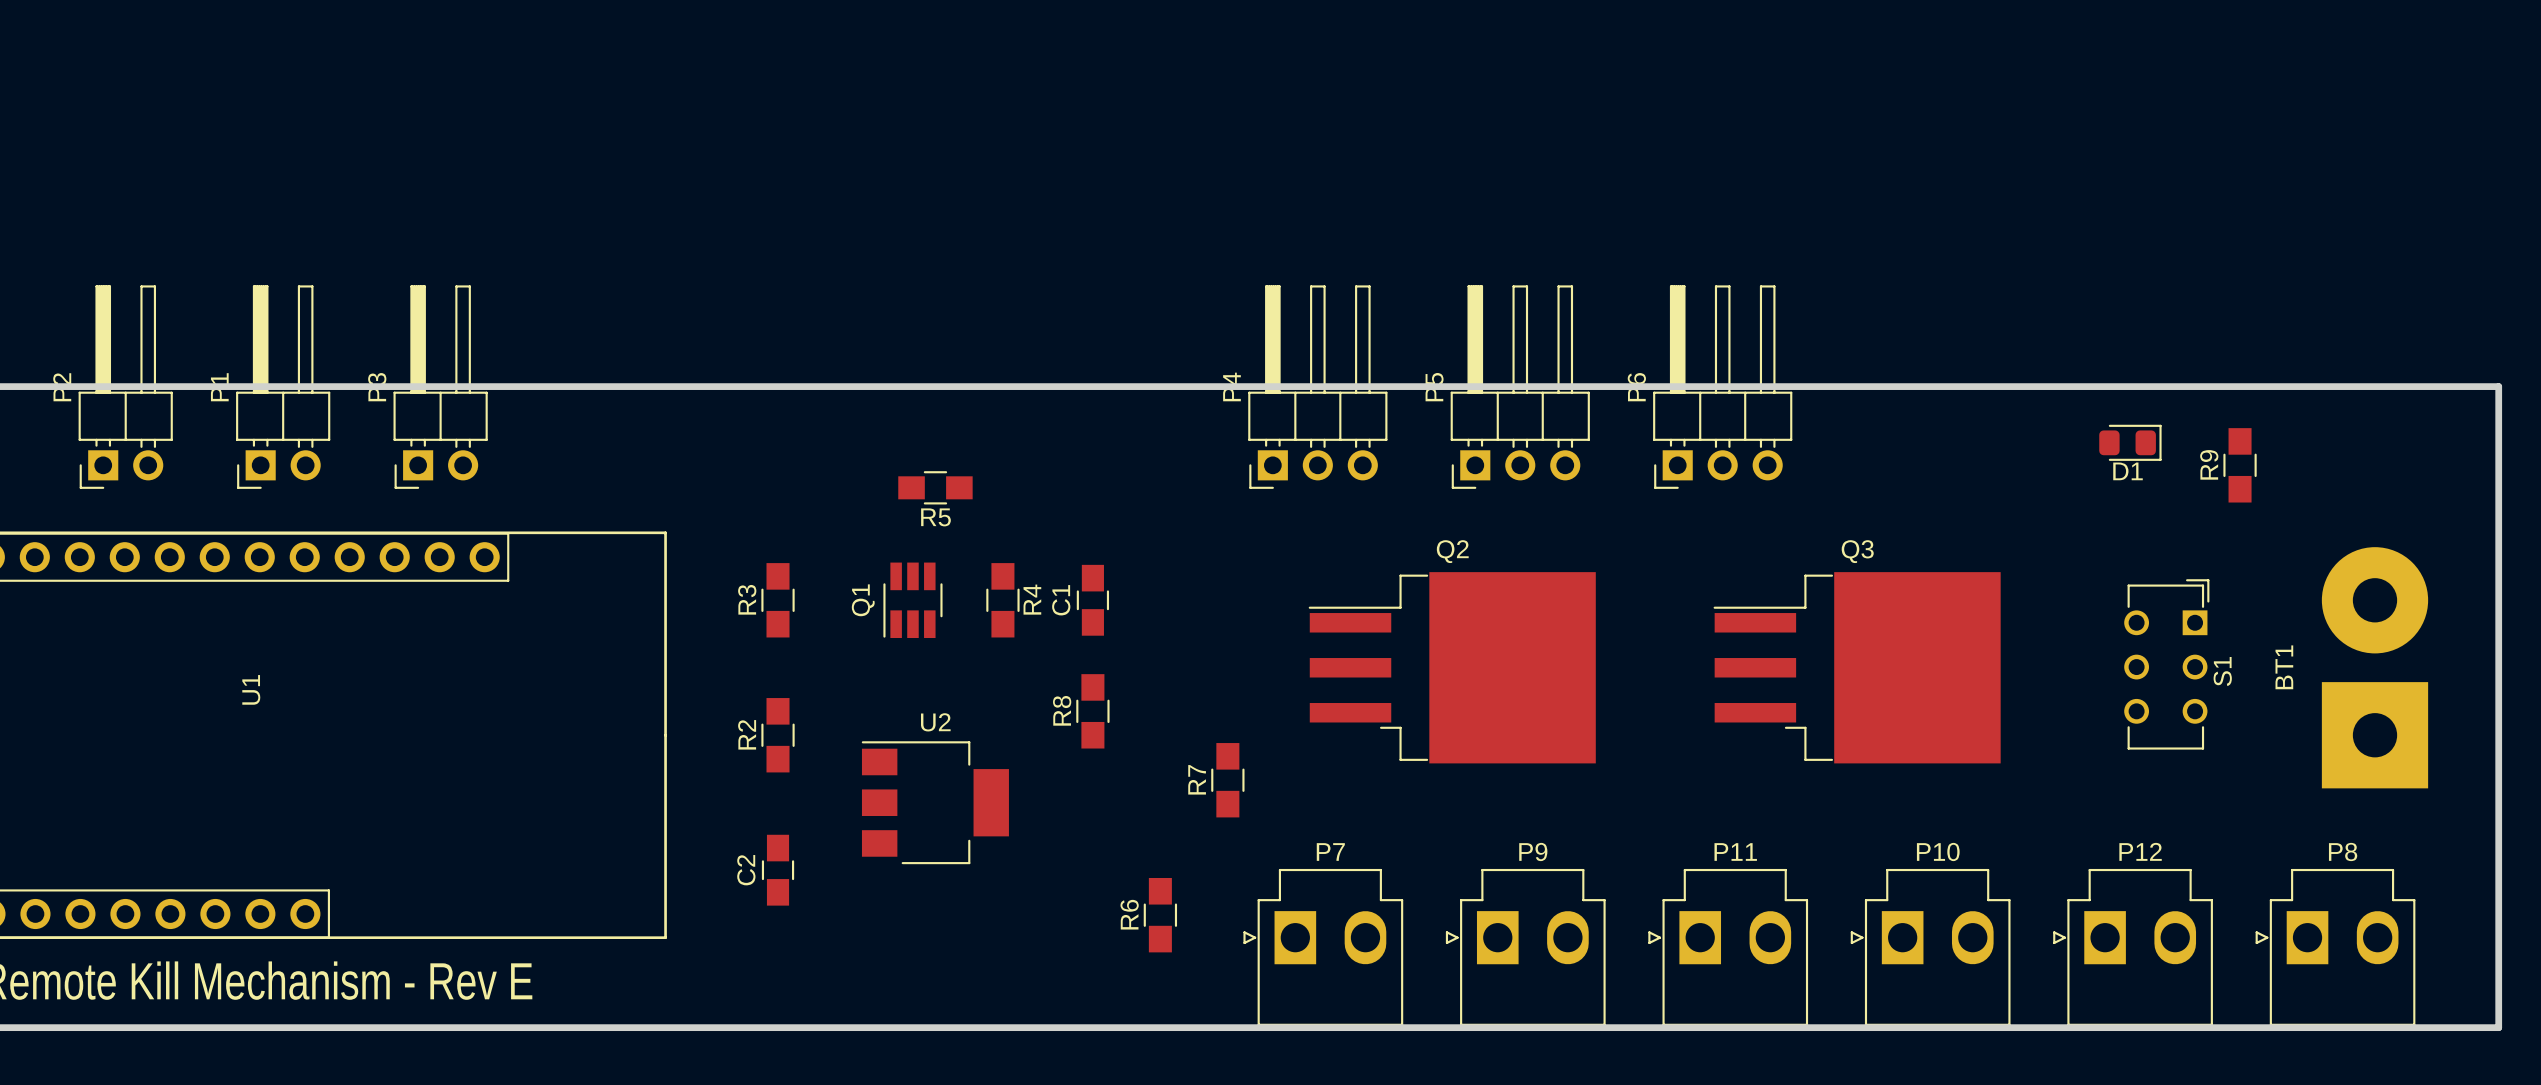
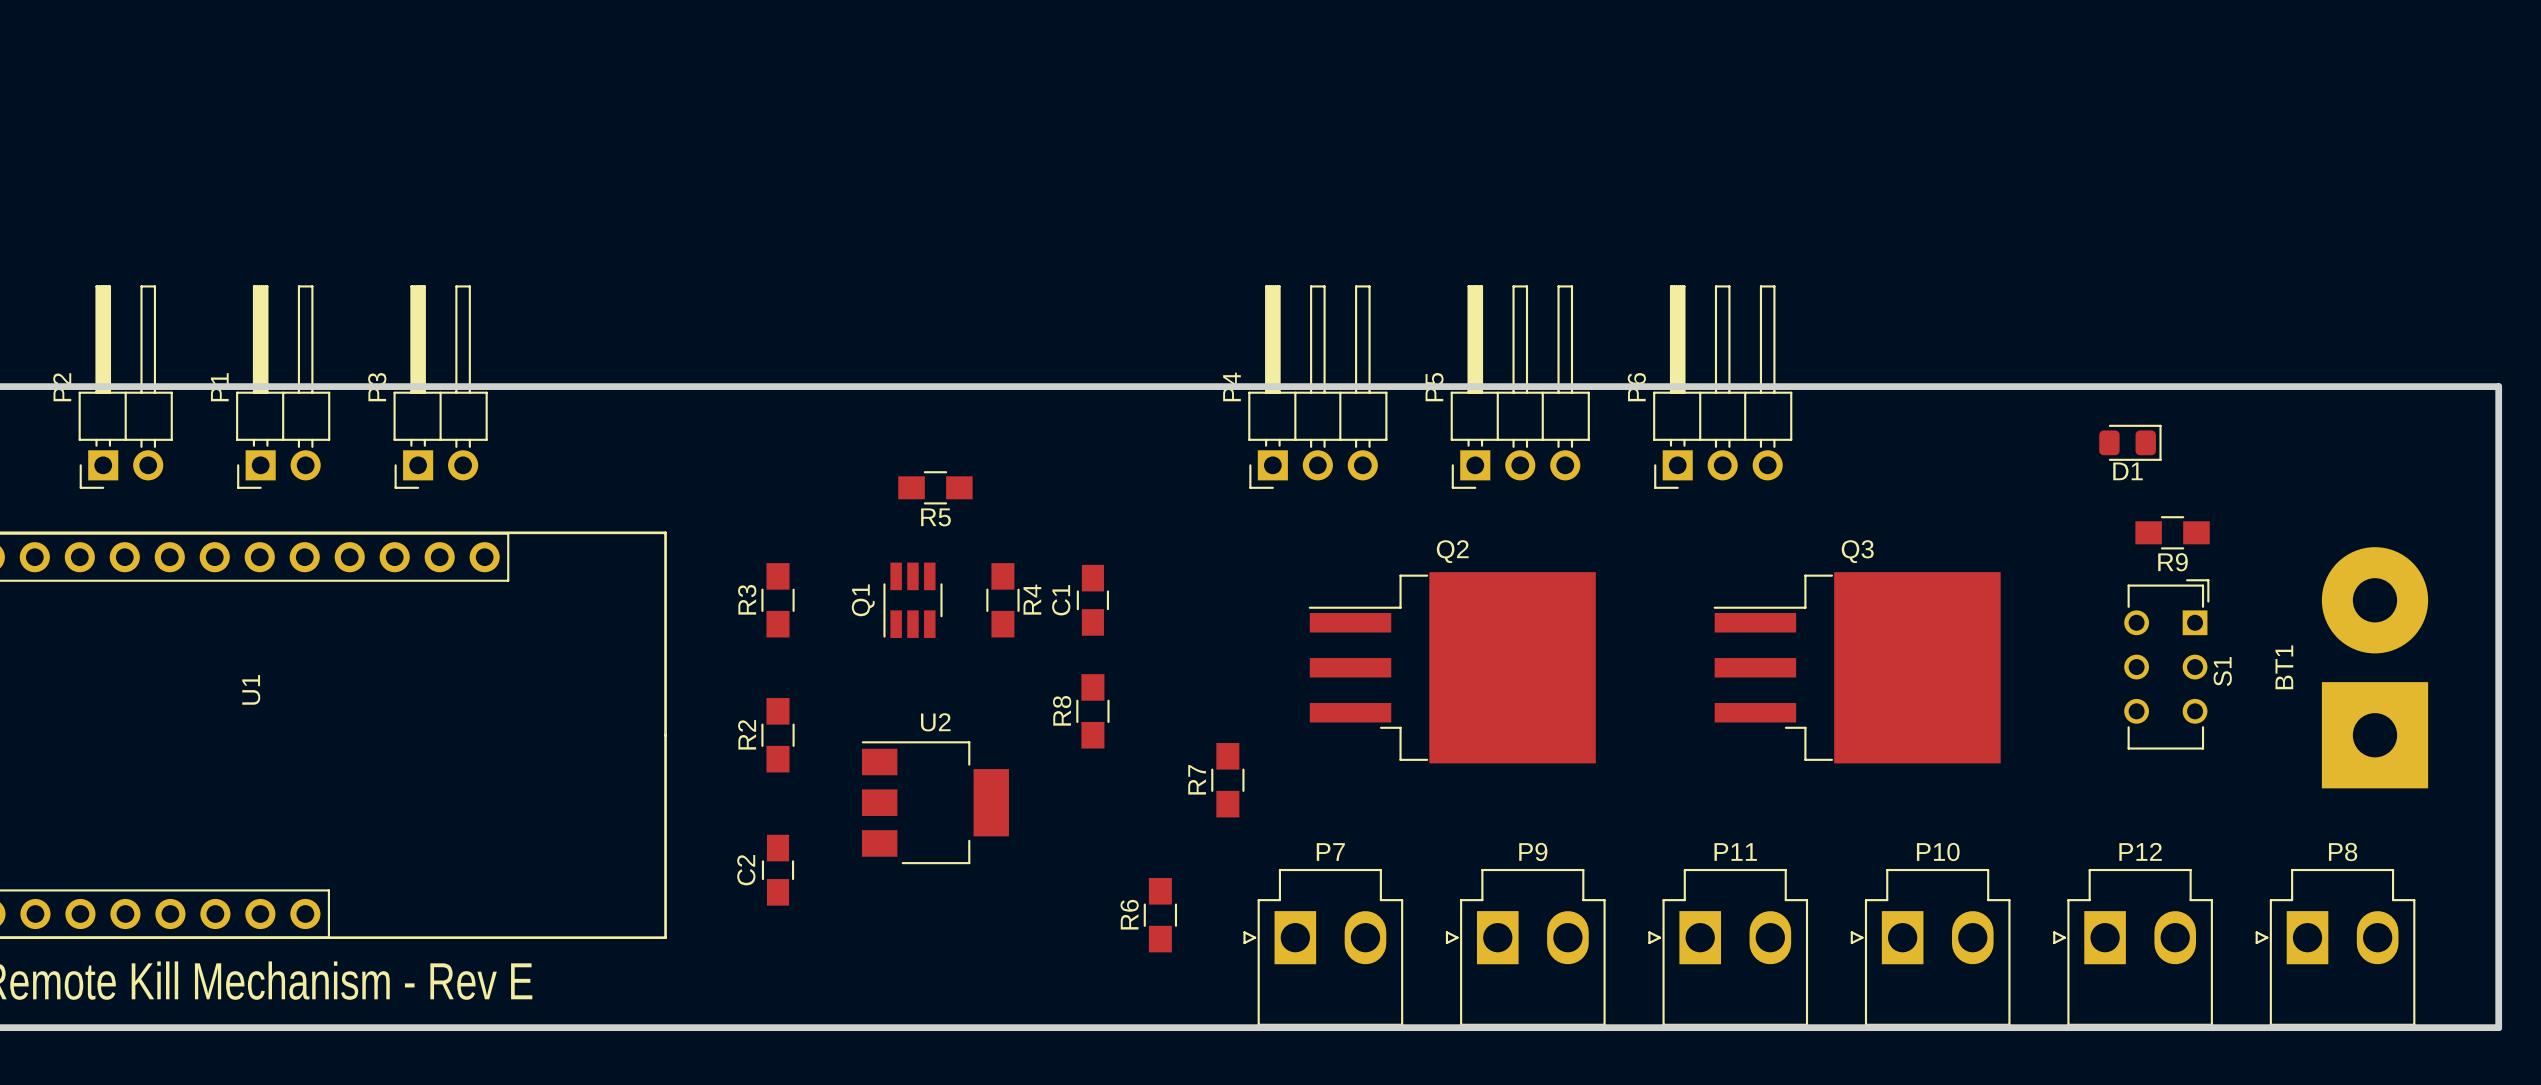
R9 name position: R9 (2209, 464) -> R9 (2173, 562)
R9 rotation: 0° (2240, 465) -> 90° clockwise (2172, 532)
R9 position: (2240, 465) -> (2172, 532)

